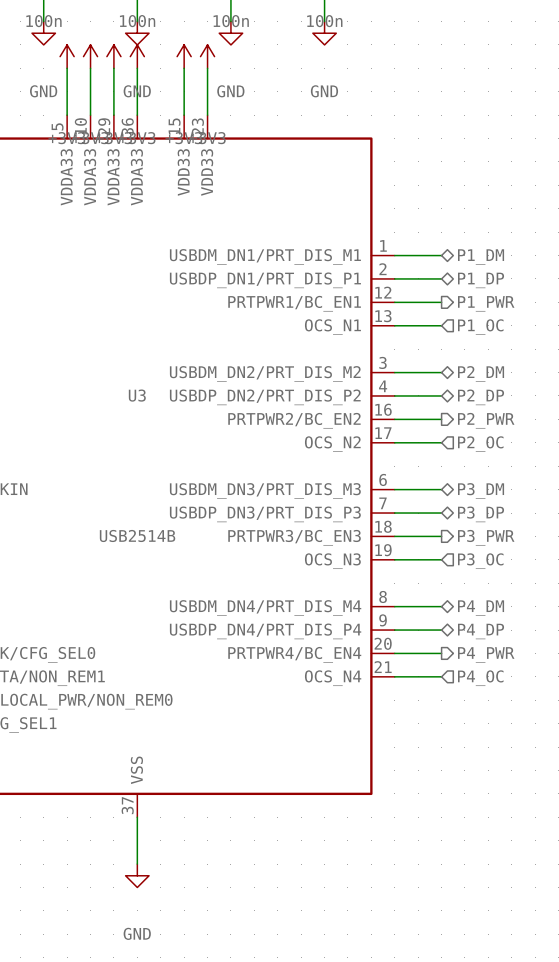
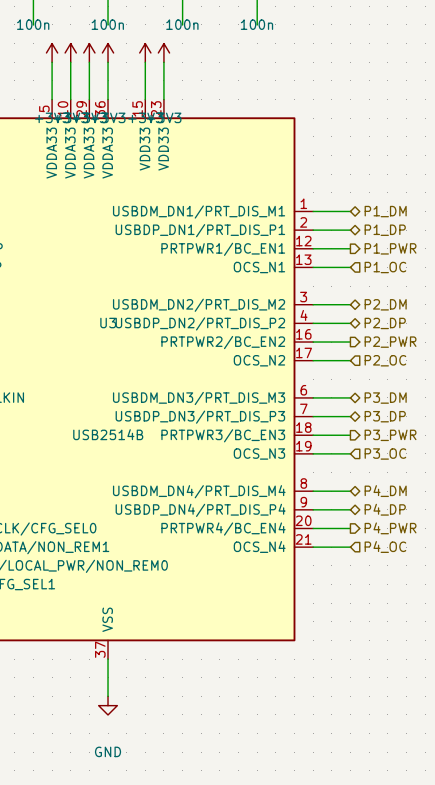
power symbol: GND (43, 33) -> none
power symbol: GND (137, 33) -> none
power symbol: GND (230, 33) -> none
power symbol: GND (324, 33) -> none

